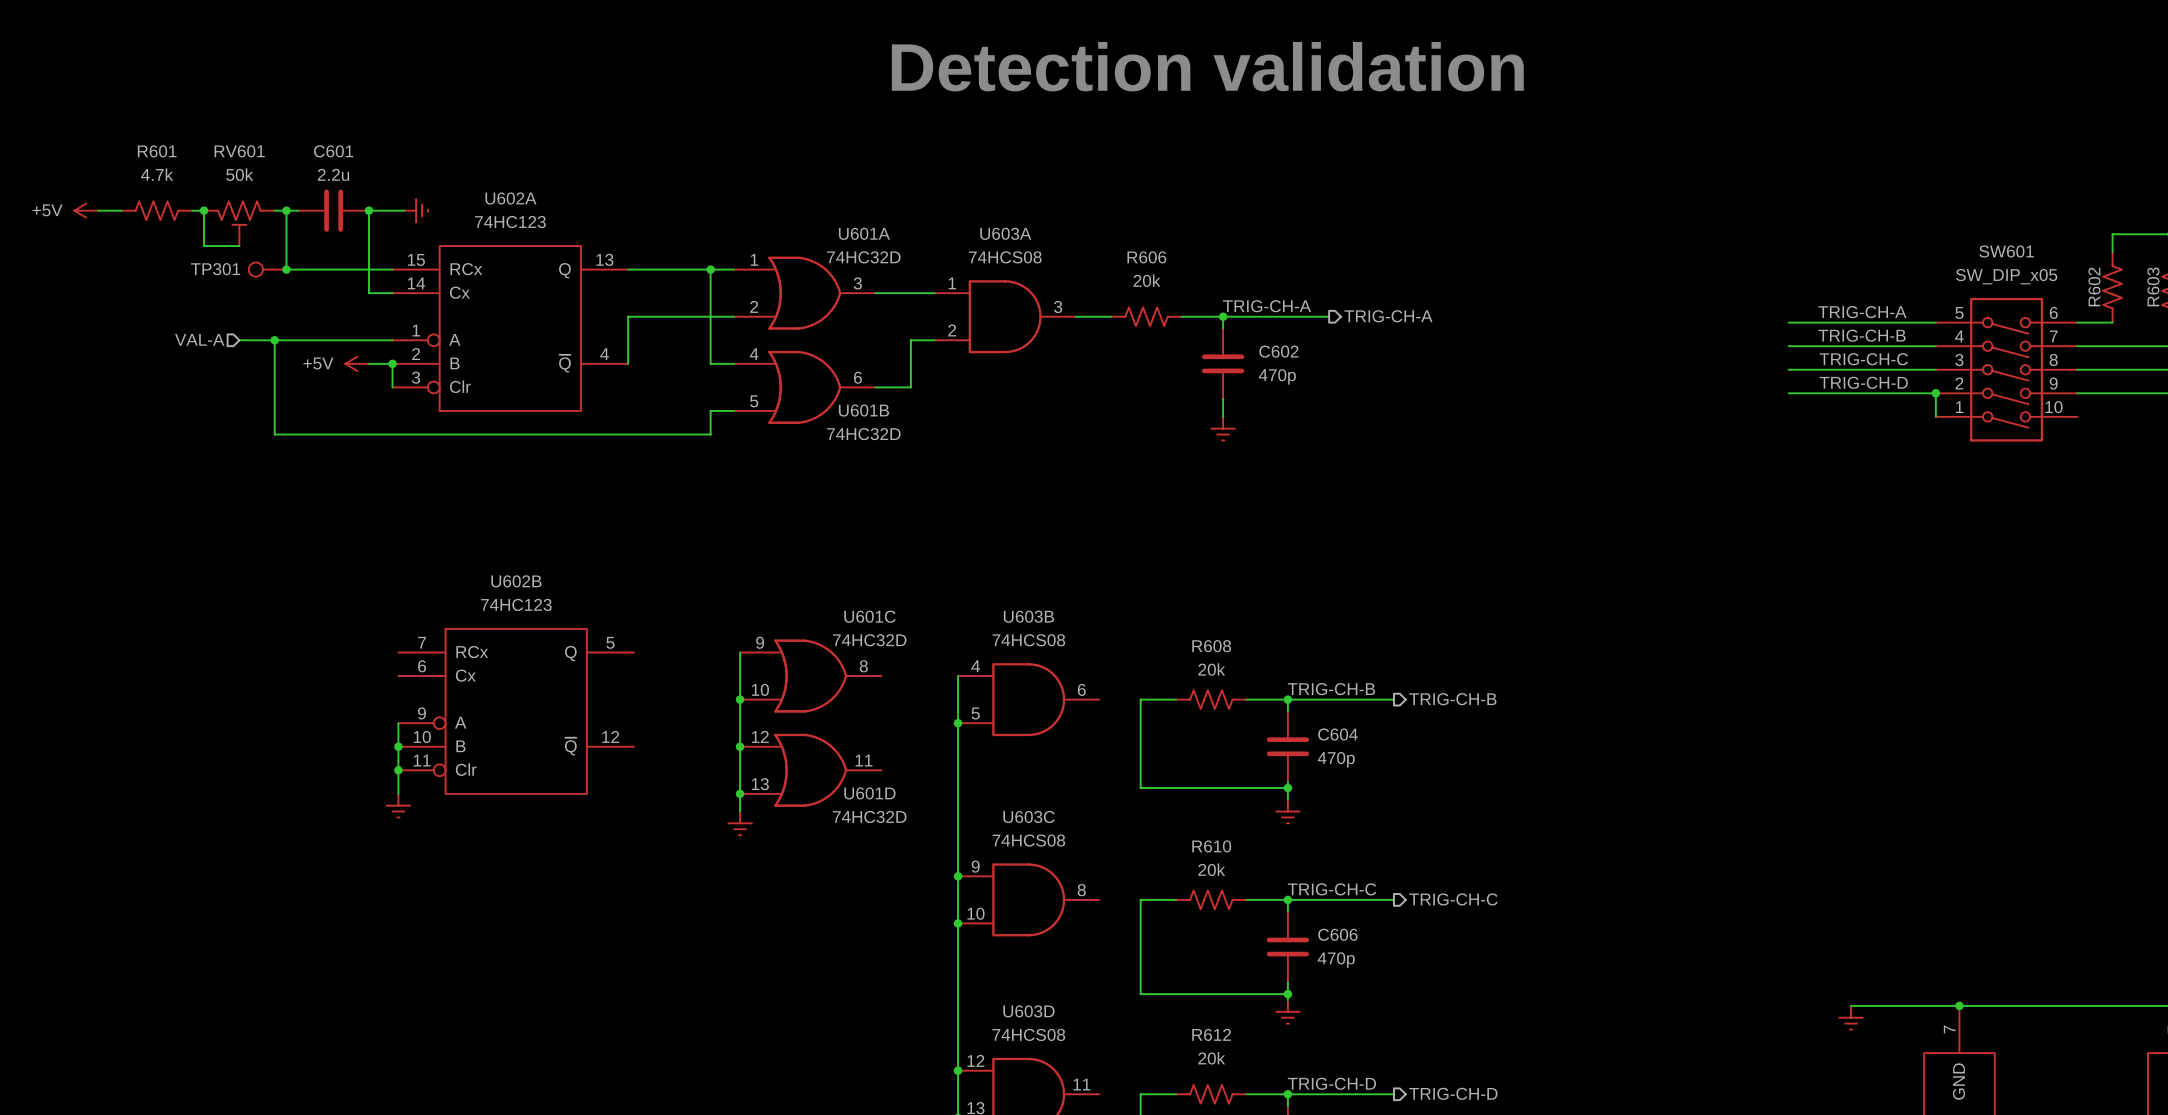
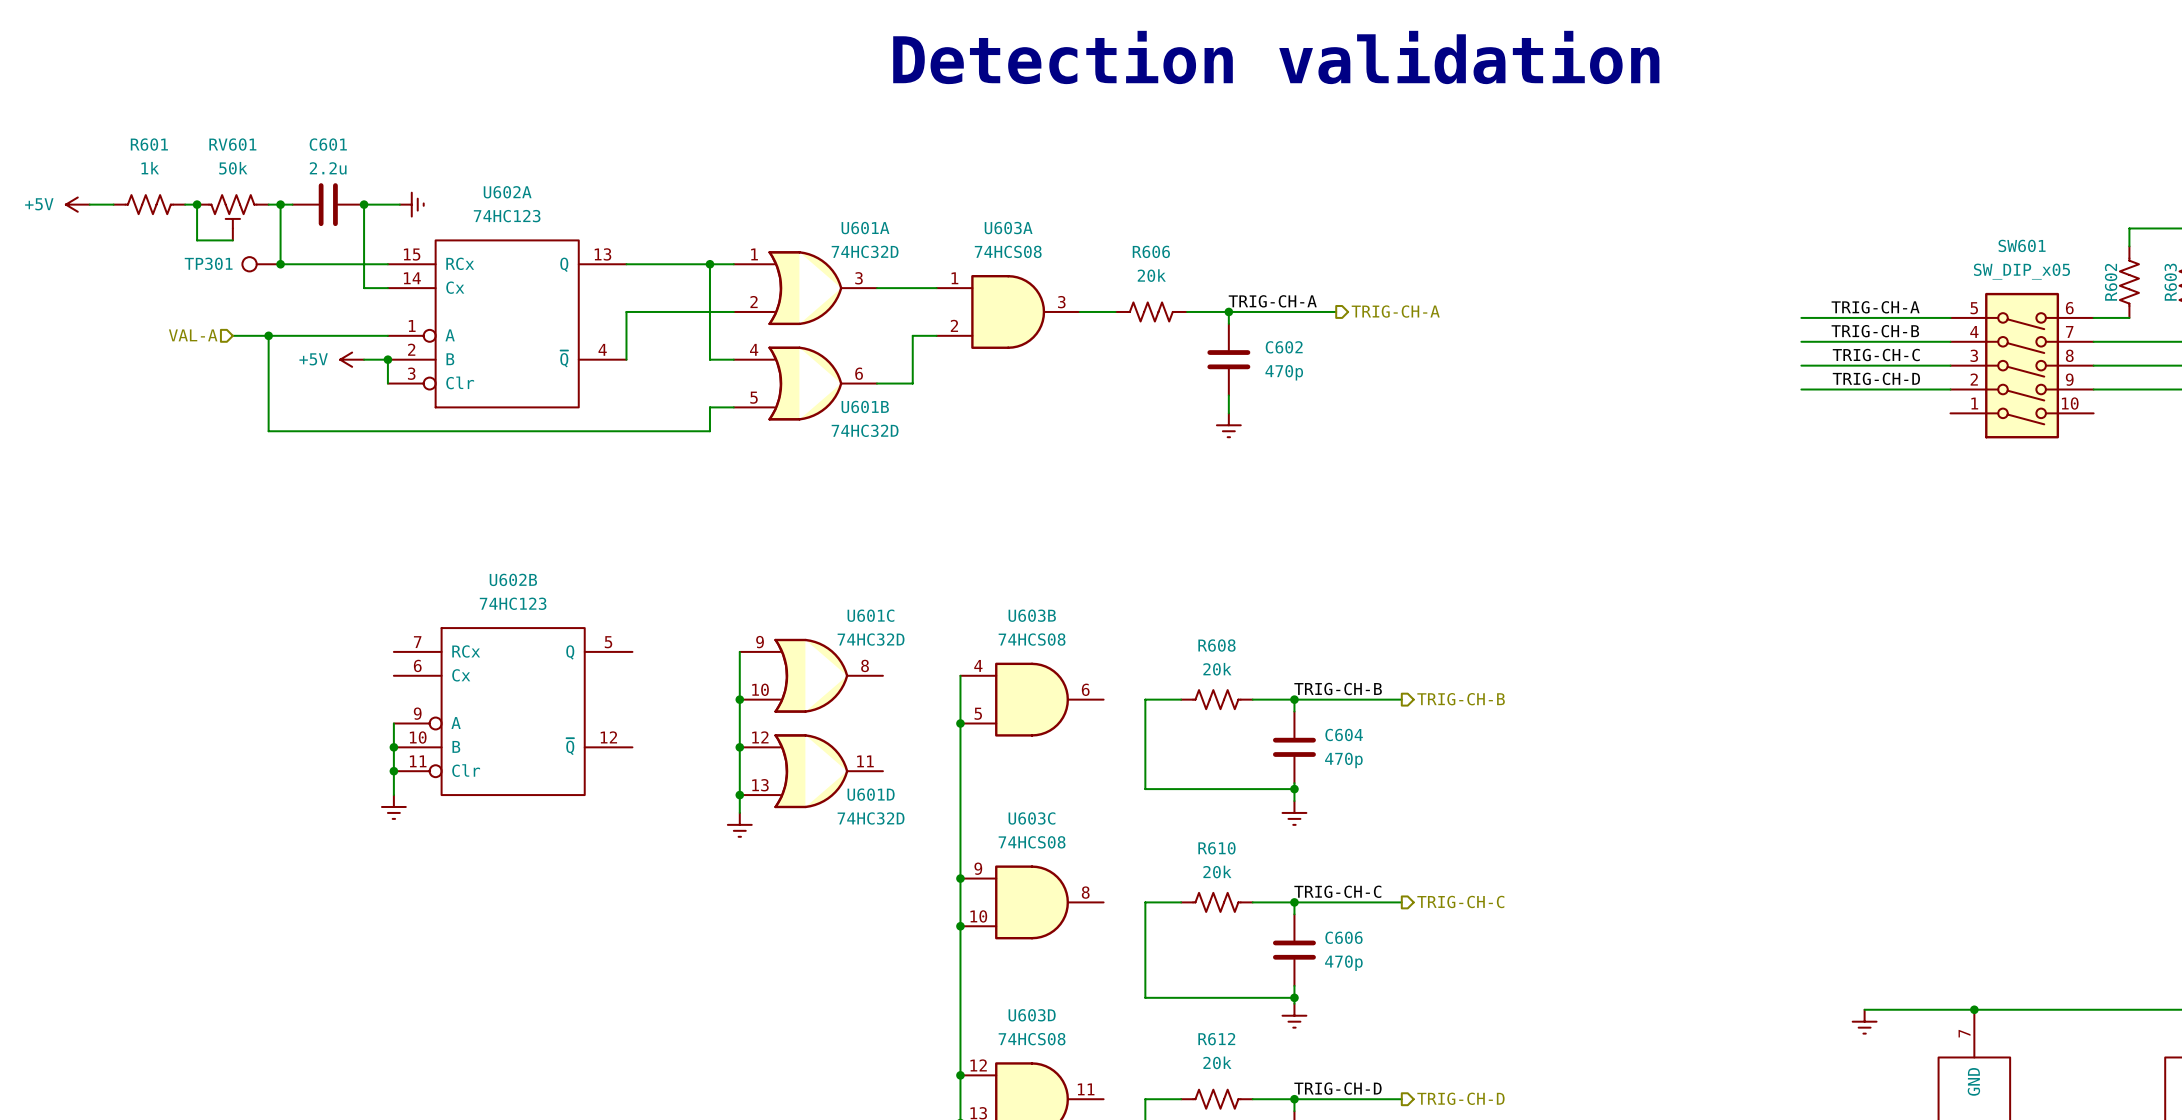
R601 value: 4.7k (157, 174) -> 1k (150, 168)
wire: (1935, 393) (1935, 416) -> none
junction: (1935, 393) -> none

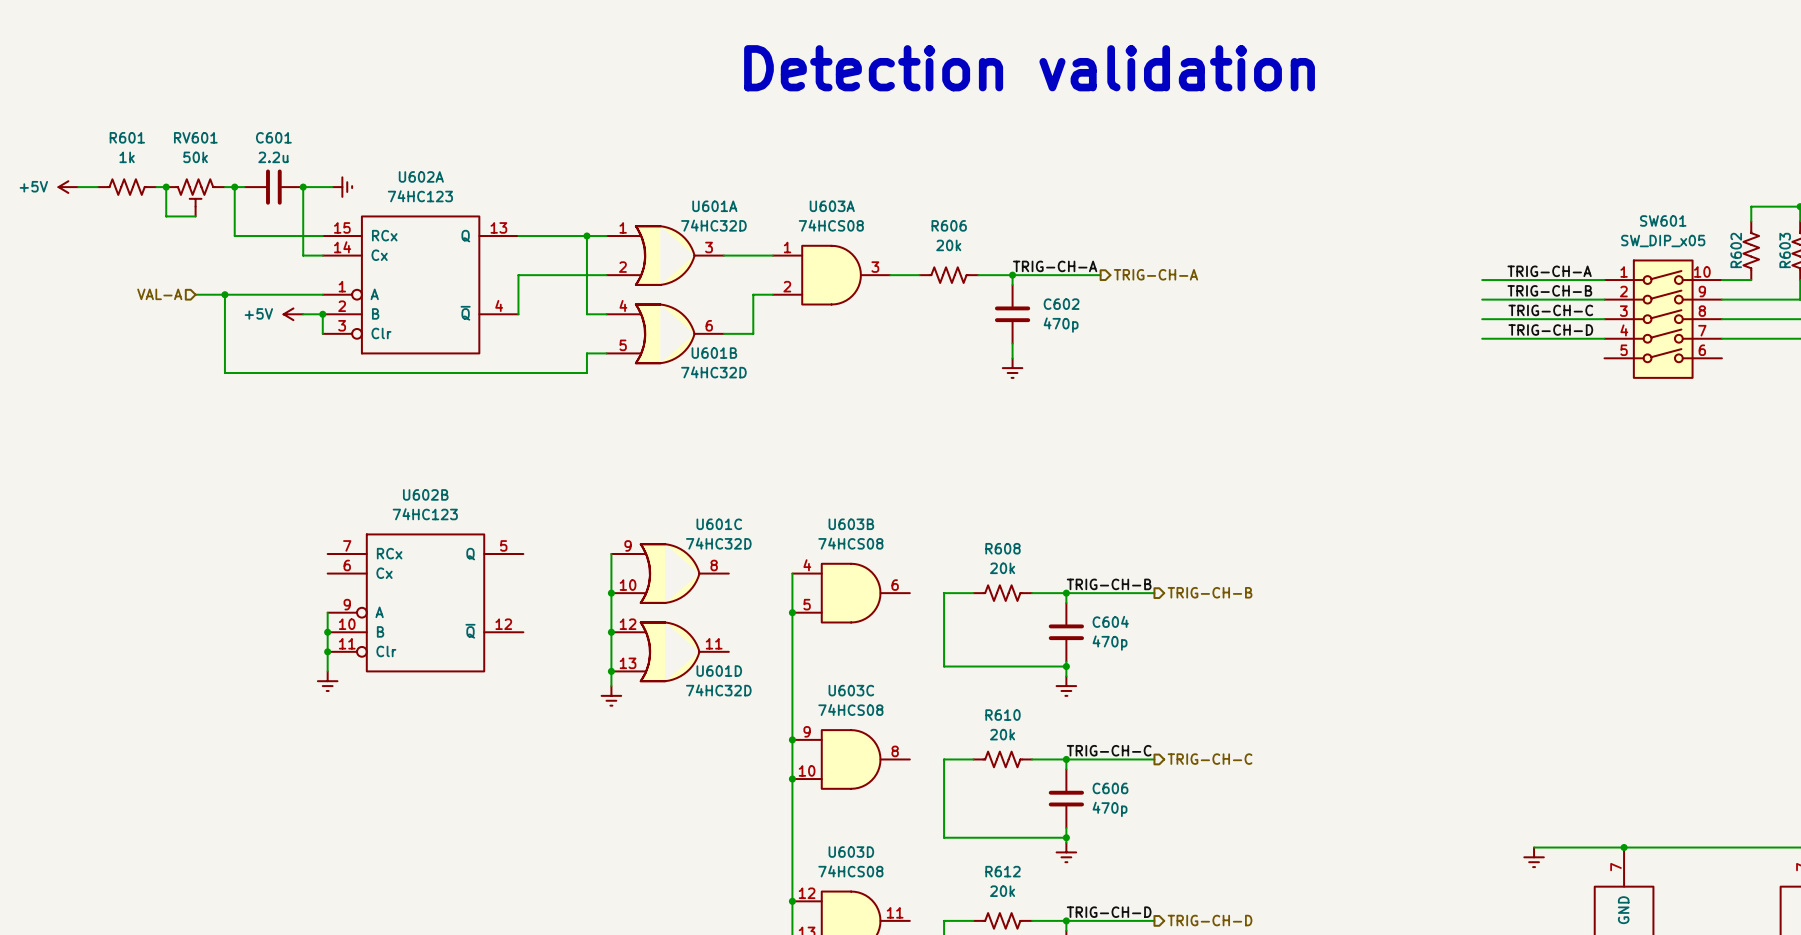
TP301: (261, 264) -> none
junction: (280, 264) -> none
SW601 flip: as is (2022, 365) -> up-down (1663, 319)

